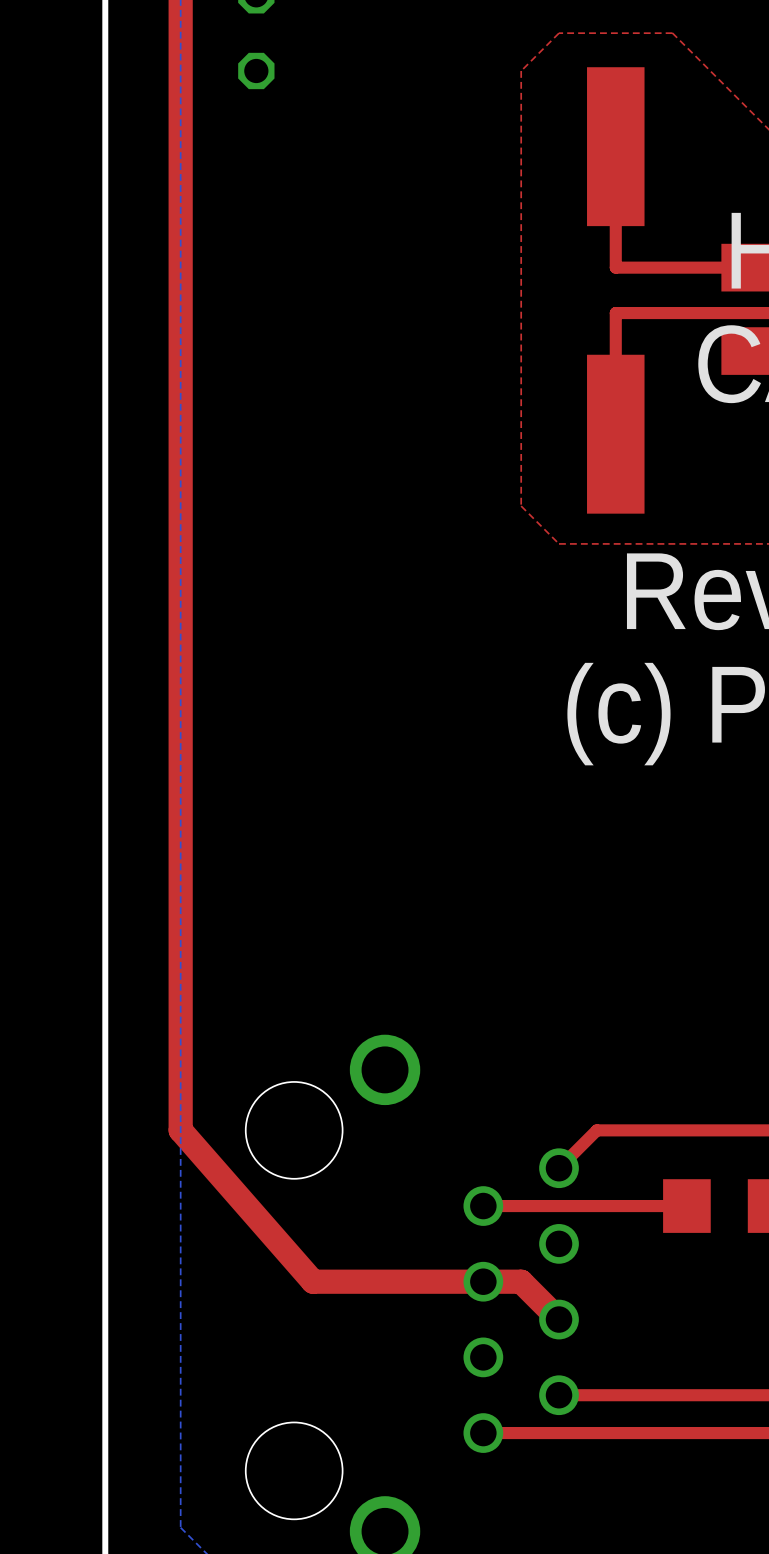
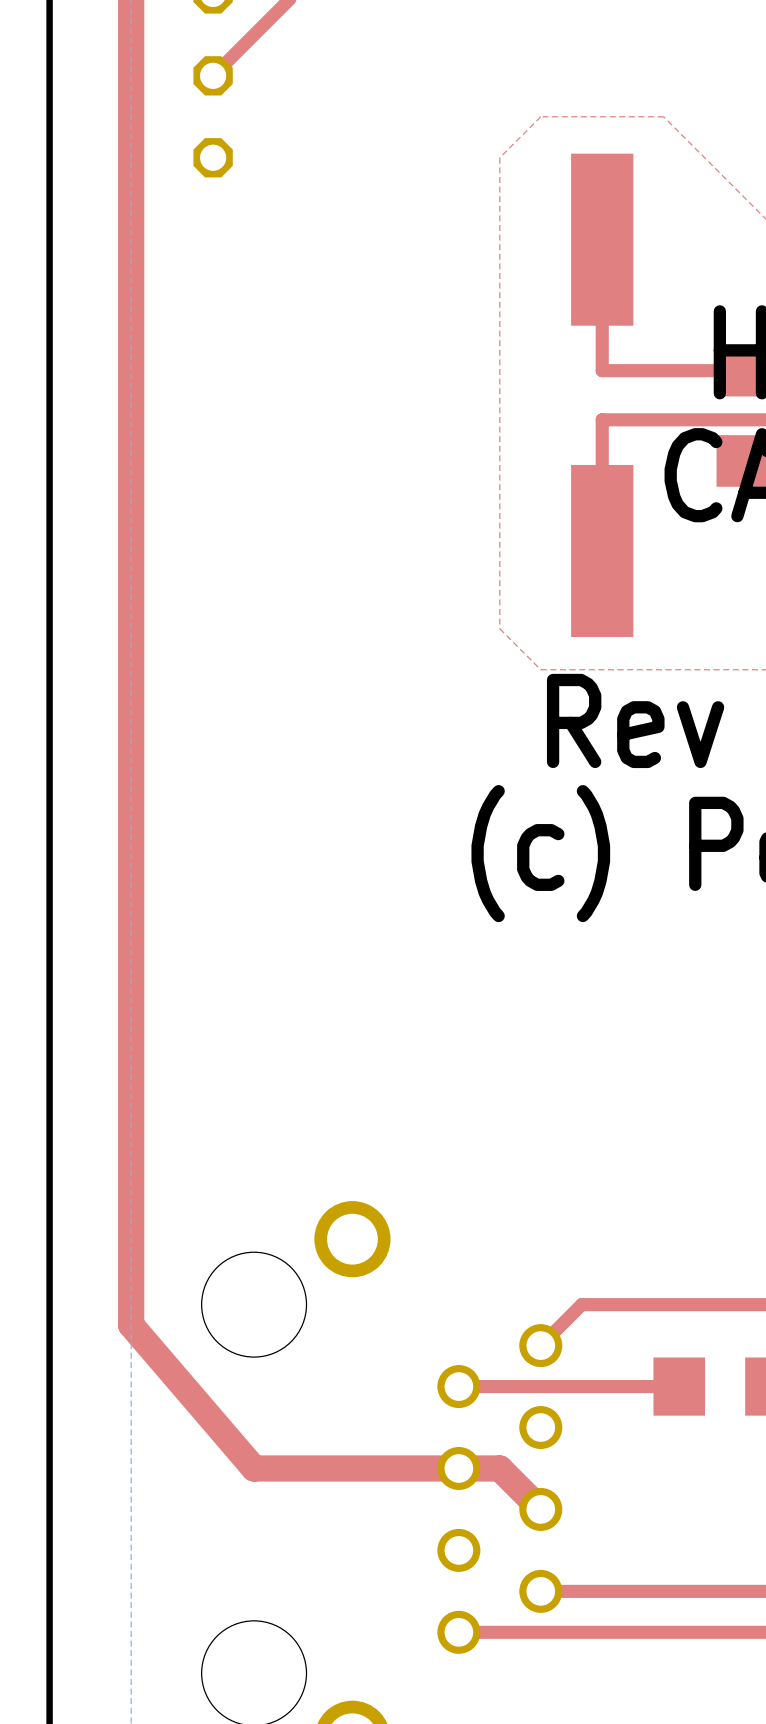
top track: (180, 1130) (313, 1281) -> (131, 1304) (131, 1325) (254, 1468) (274, 1468)

